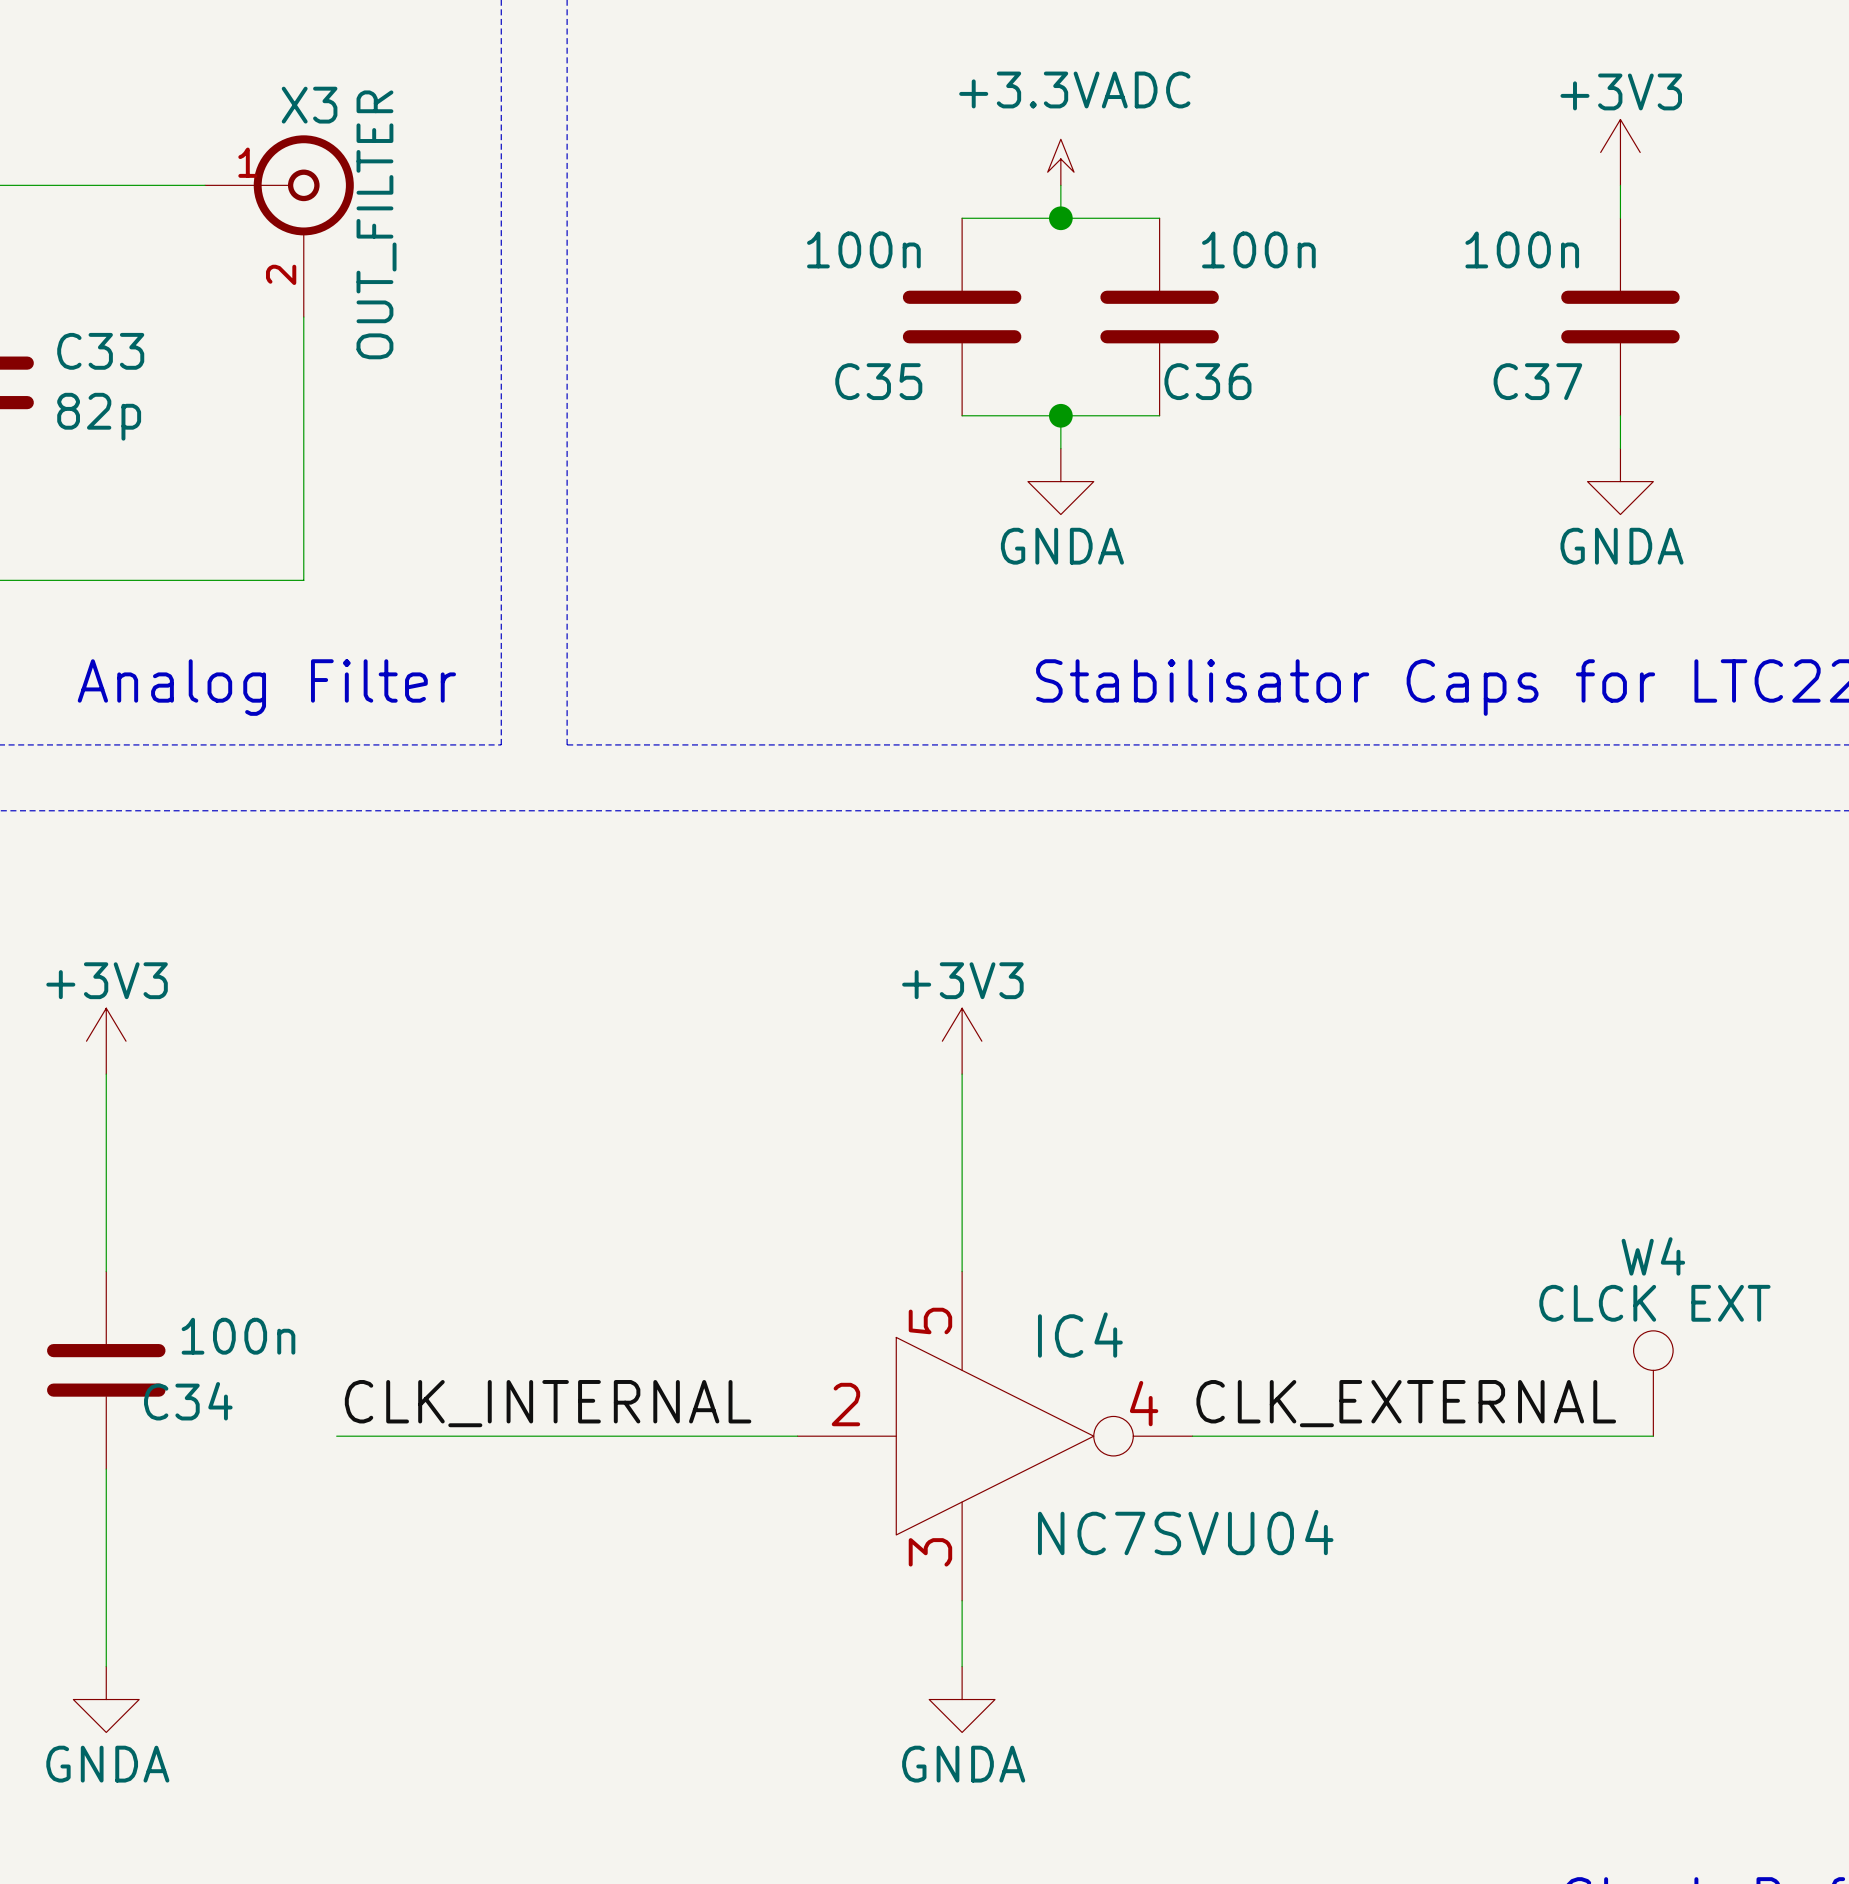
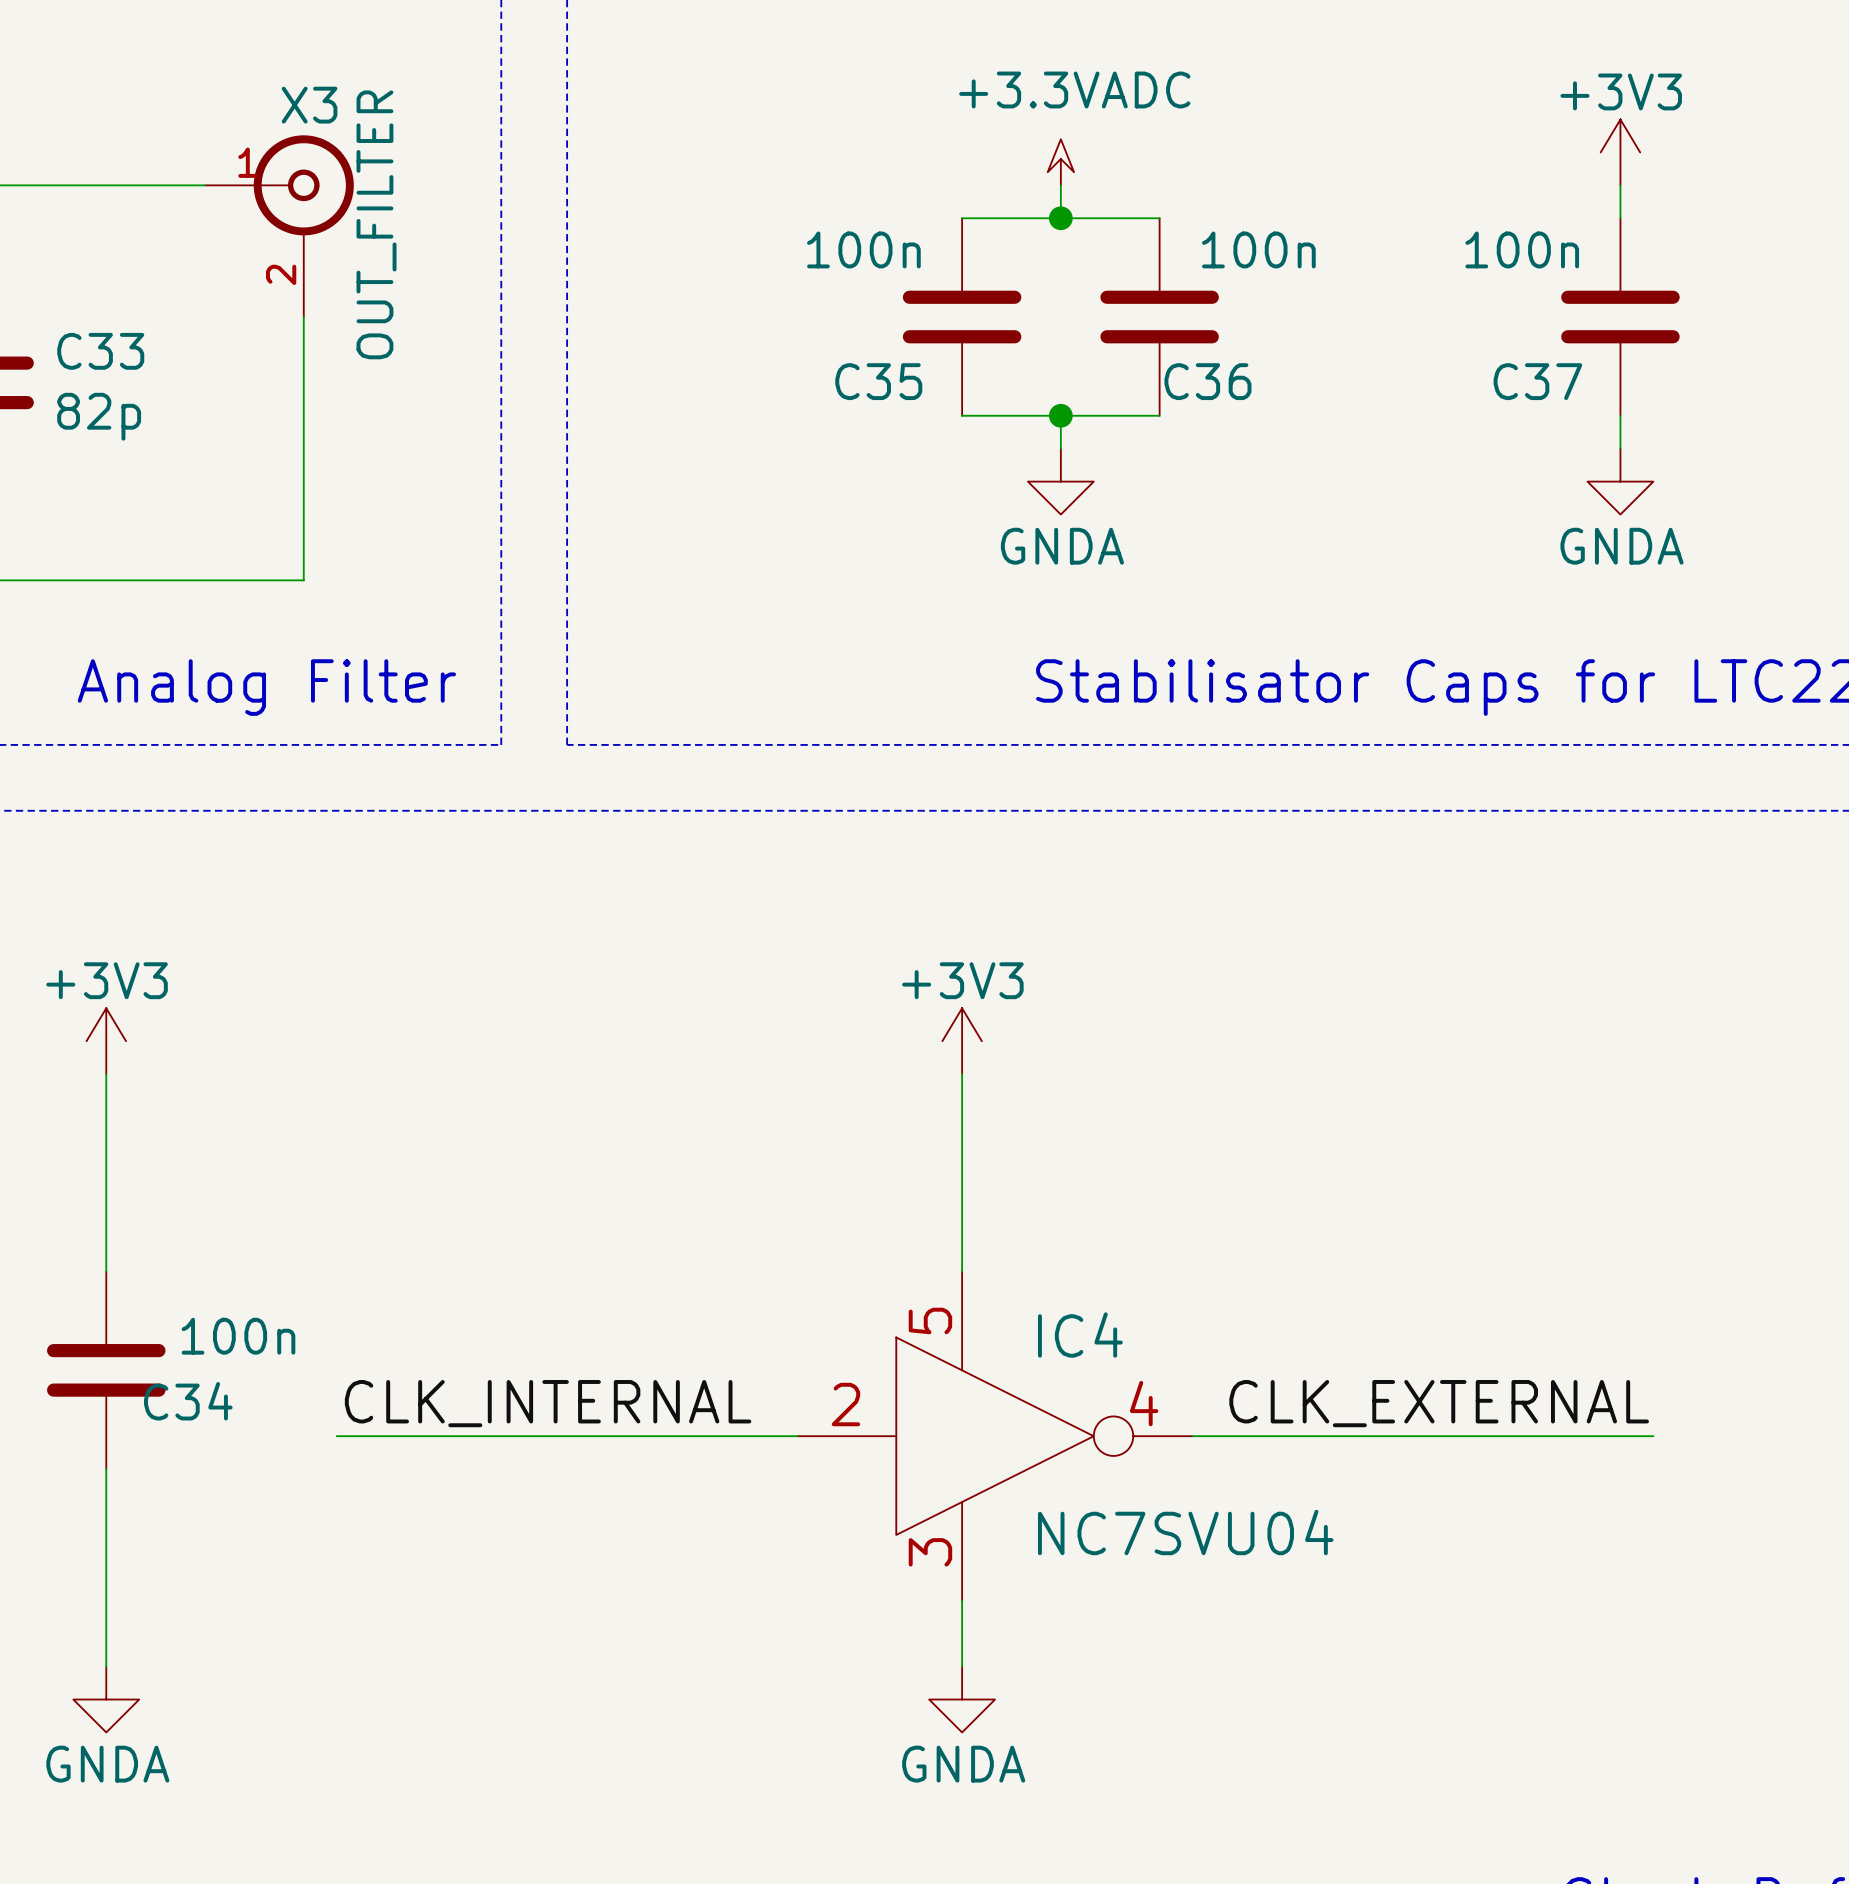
W4: CLCK EXT (1653, 1383) -> none
label position: CLK_EXTERNAL (1406, 1403) -> CLK_EXTERNAL (1439, 1403)

